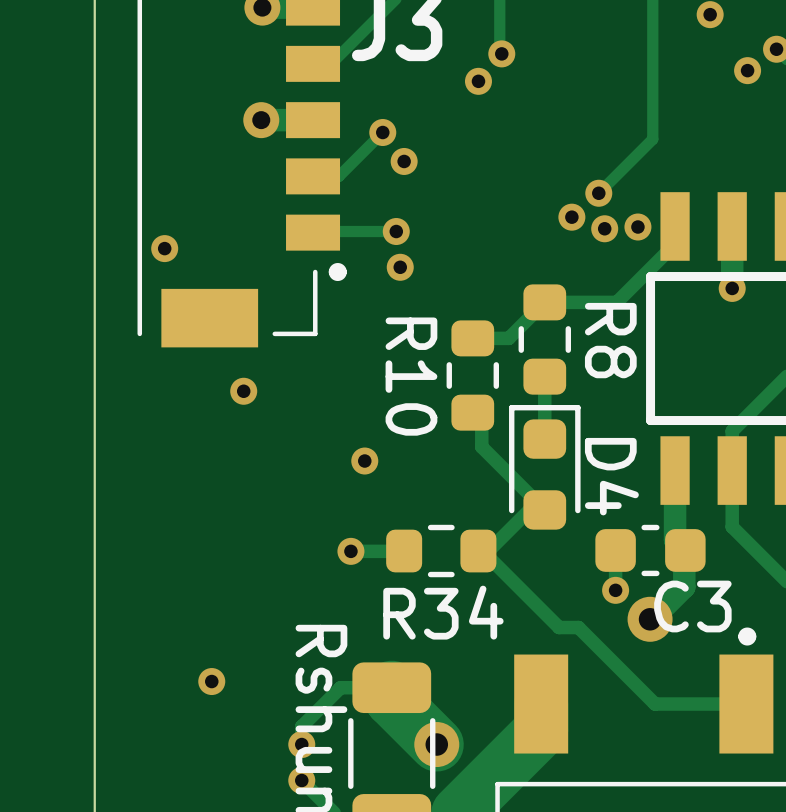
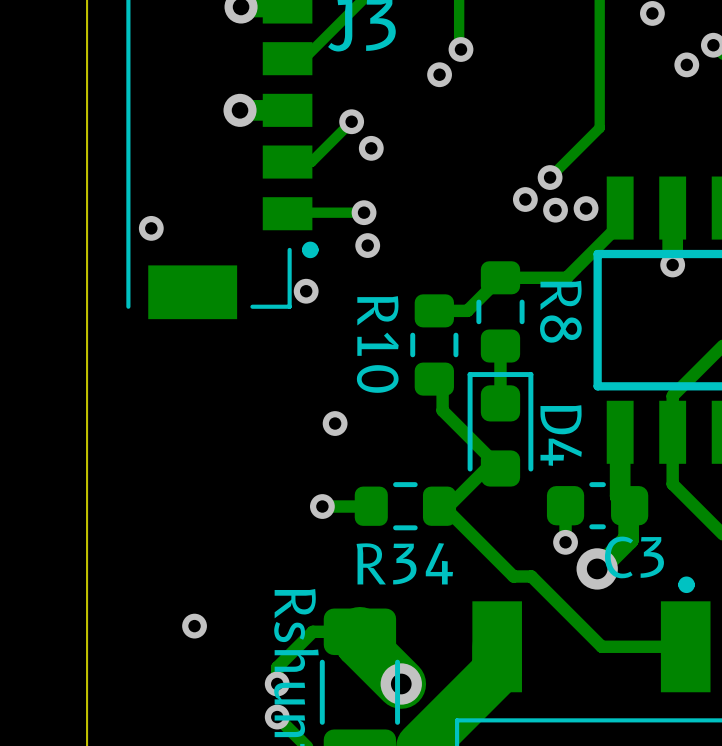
via position: (243, 391) -> (306, 291)

